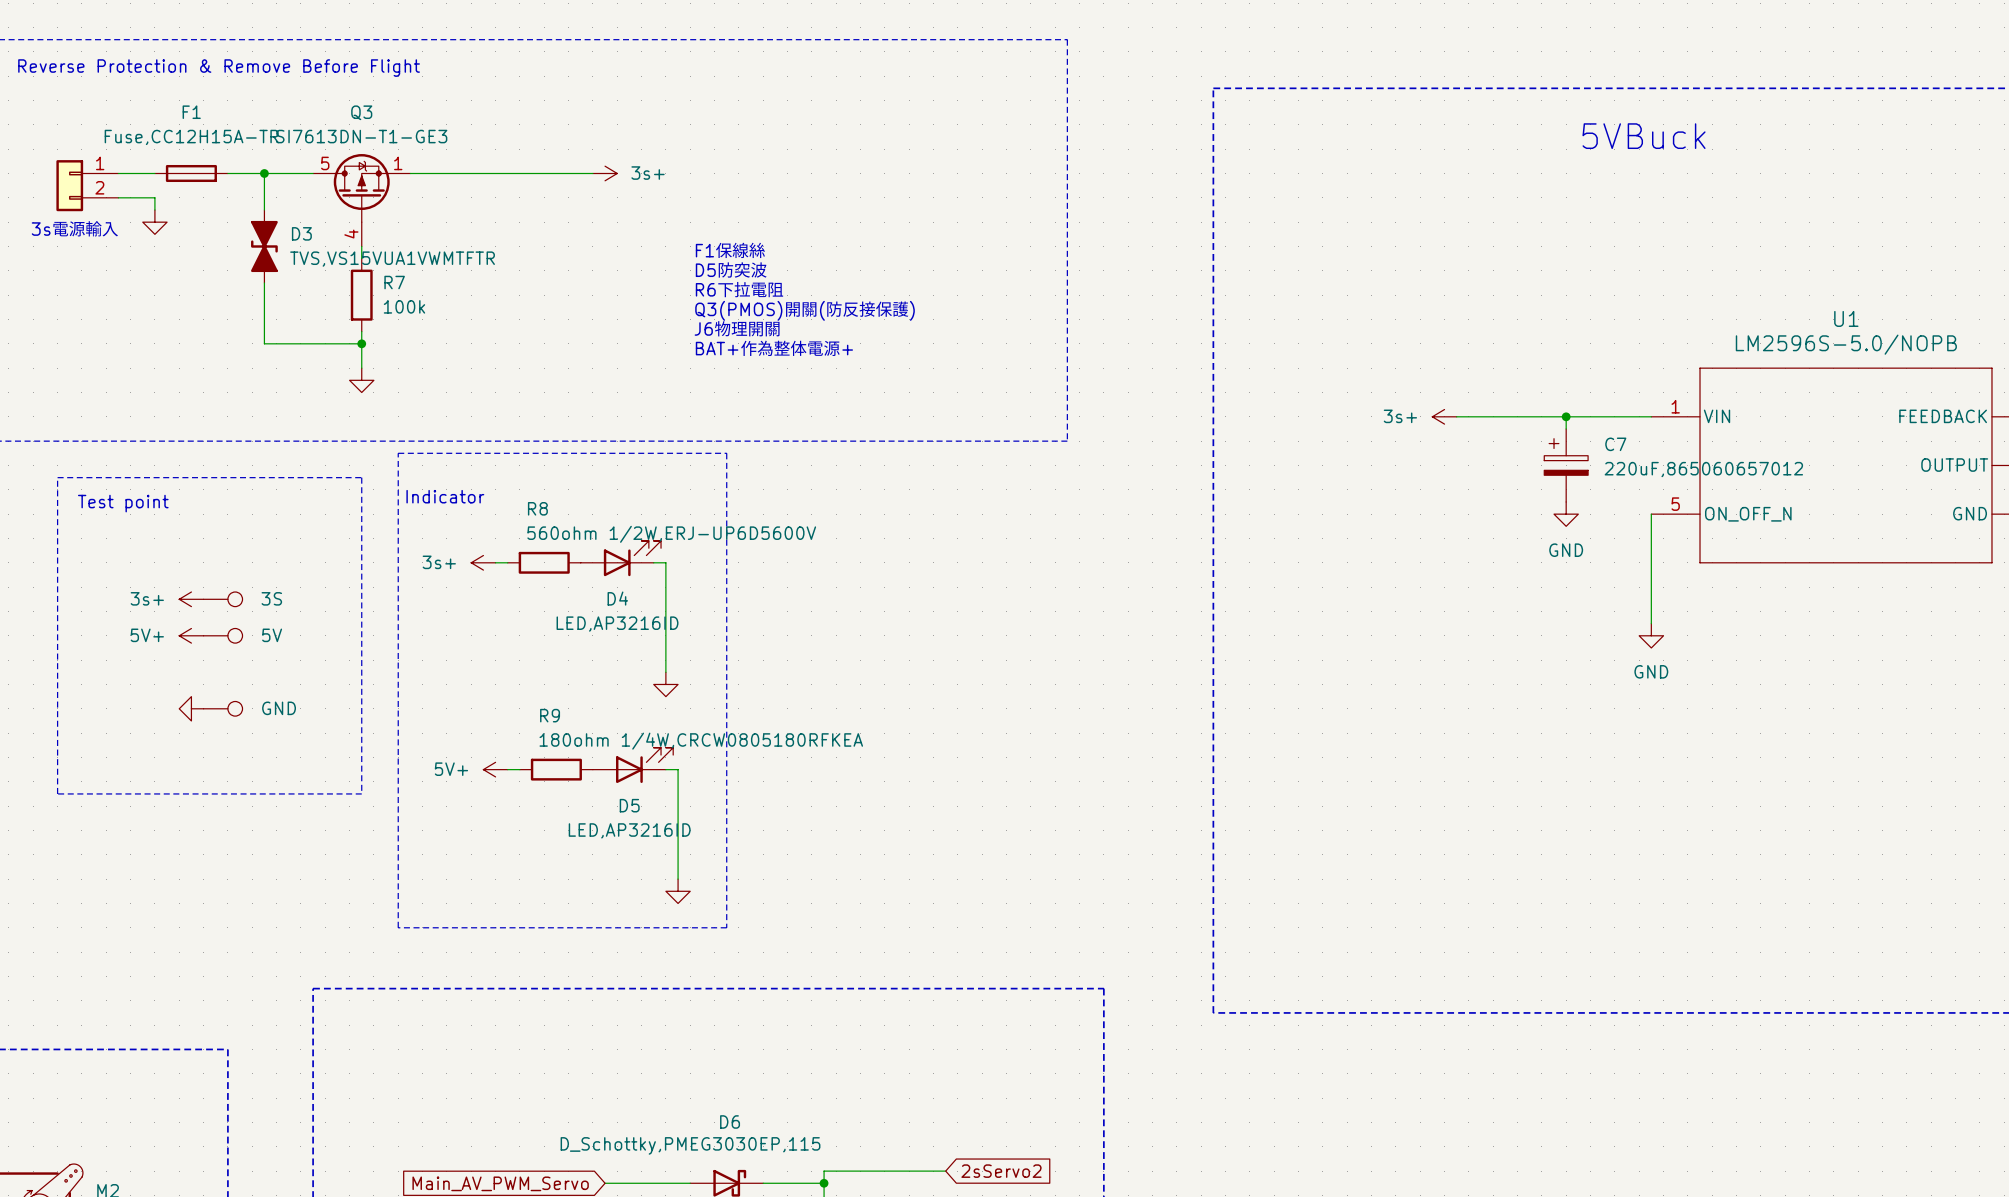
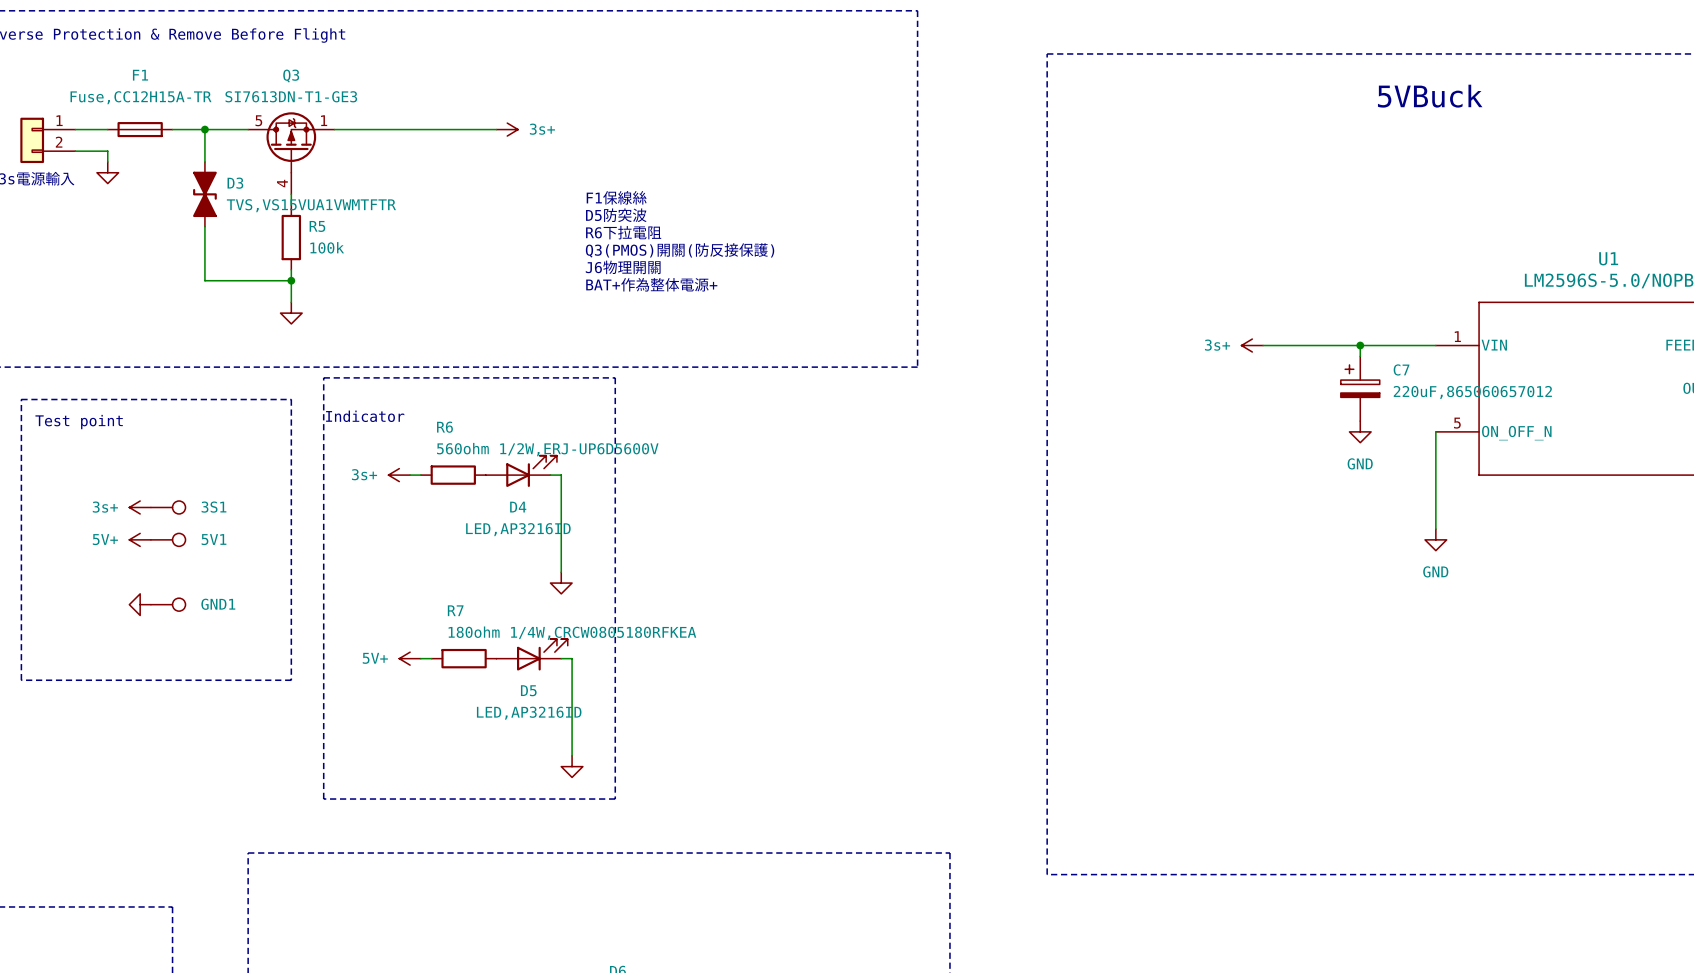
R7 name: R7 (394, 282) -> R5 (317, 226)
R8 name: R8 (537, 508) -> R6 (444, 427)
3S name: 3S (271, 598) -> 3S1 (213, 507)
5V name: 5V (272, 635) -> 5V1 (214, 539)
GND name: GND (279, 708) -> GND1 (218, 604)
R9 name: R9 (550, 715) -> R7 (455, 610)

